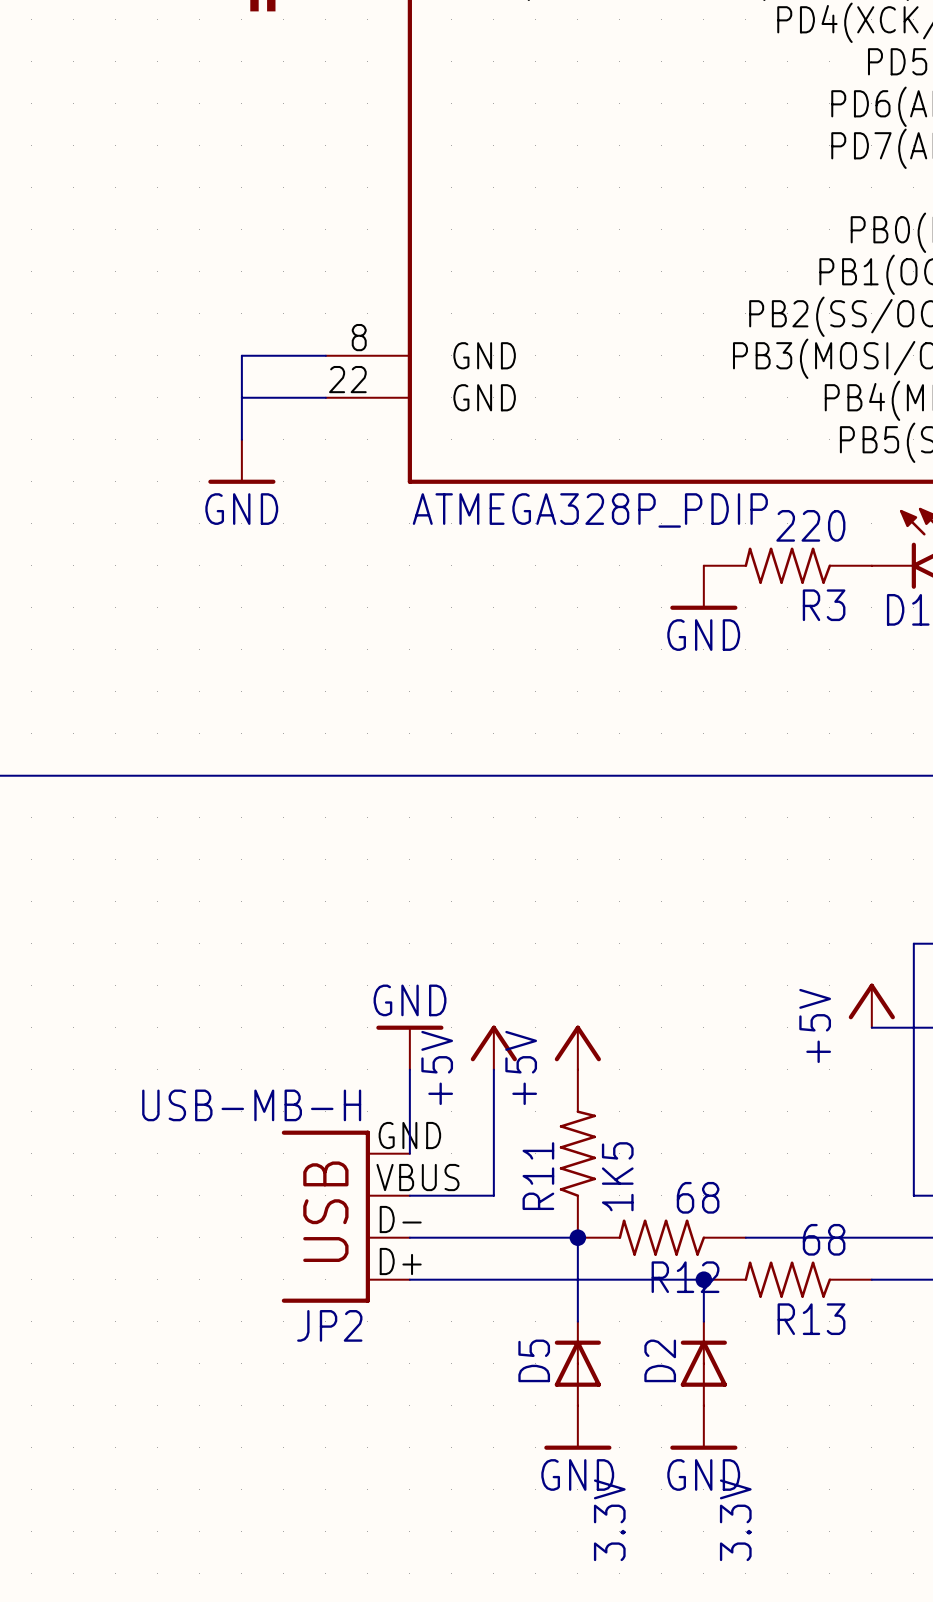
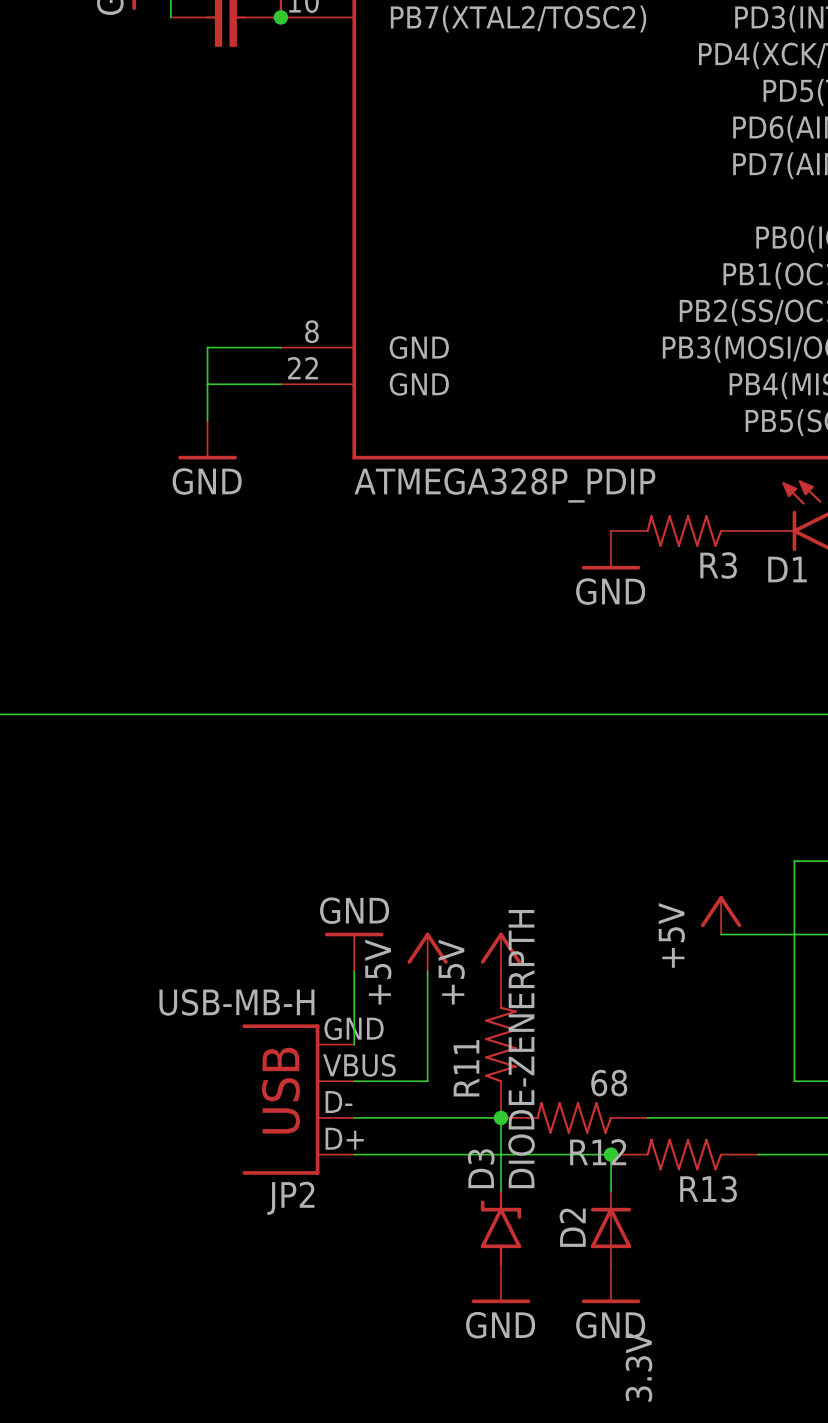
R3 value: 220 (810, 525) -> none
power symbol position: +5V (871, 1005) -> +5V (721, 915)
wire: none -> (721, 934) (757, 934)
R11 value: 1K5 (617, 1176) -> none
R13 value: 68 (824, 1239) -> none
D5: 3.3V (577, 1363) -> none
D3: none -> DIODE-ZENERPTH (500, 1227)

